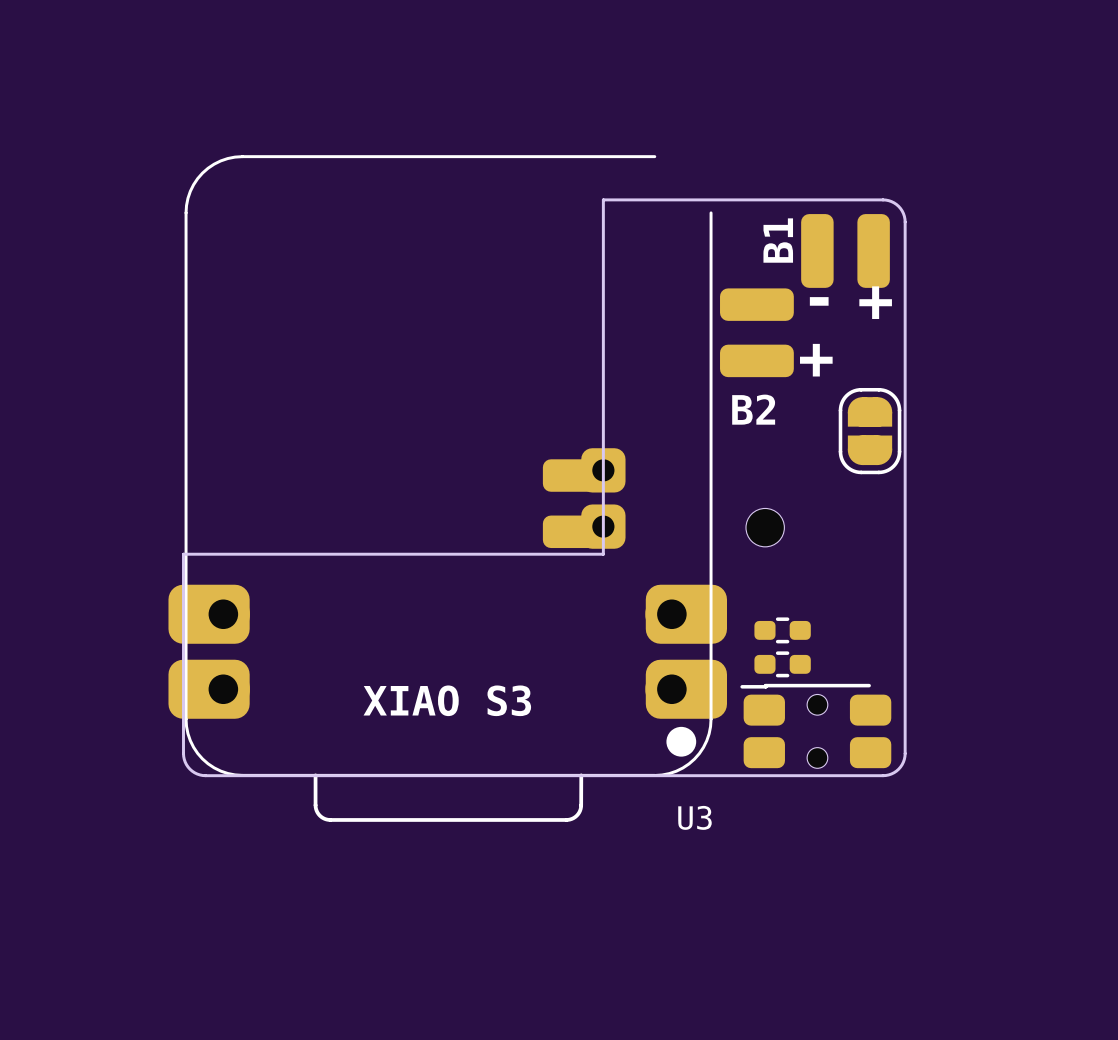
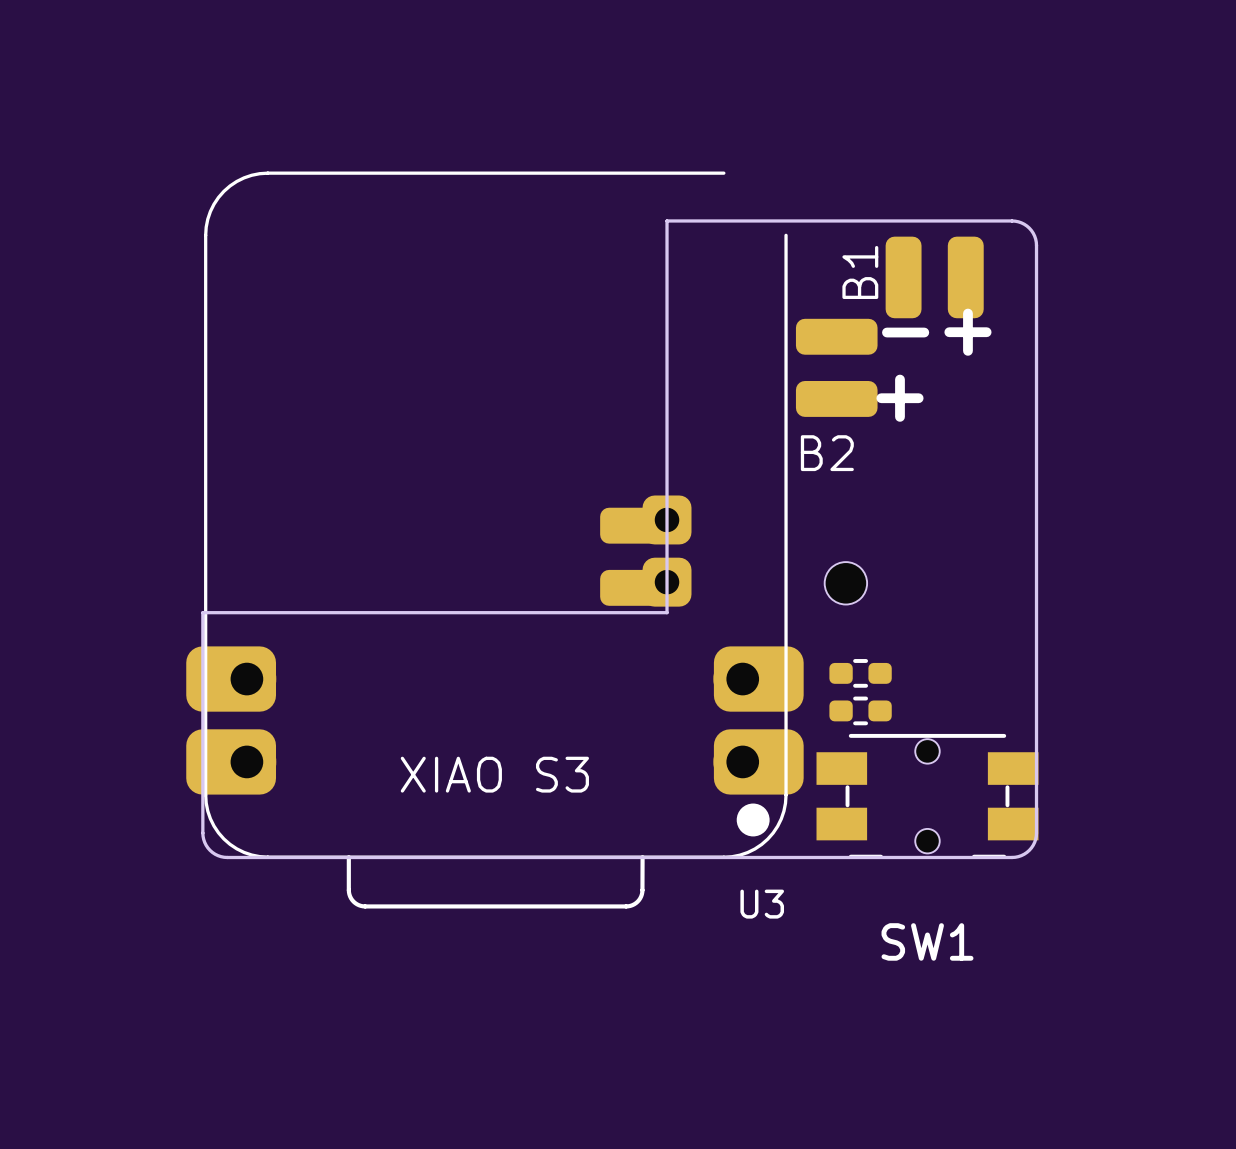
board edge: (883, 199) (891, 201) (898, 206) (903, 213) (905, 222) (905, 753) (903, 762) (898, 769) (891, 773) (883, 775) -> (976, 220) (1021, 222) (1033, 233) (1036, 245) (1036, 836) (1031, 847) (1021, 855) (976, 857)
part: (870, 431) -> none
part: none -> (860, 673)
part: (782, 630) -> none
part: none -> (860, 710)
part: (782, 664) -> none
SW1: none -> (927, 796)
part: (815, 726) -> none

